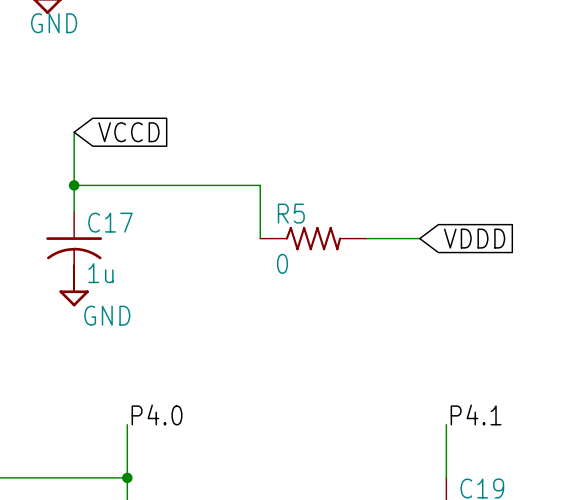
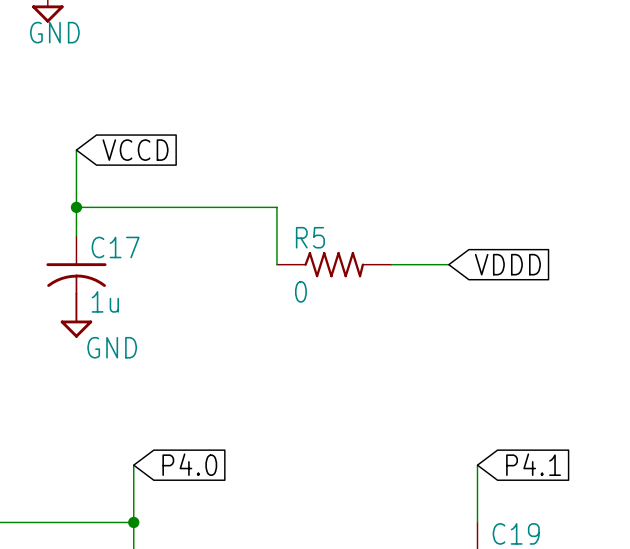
label: P4.0 (157, 414) -> none
label: P4.1 (476, 414) -> none
global label: none -> P4.0 (189, 464)
global label: none -> P4.1 (533, 464)

